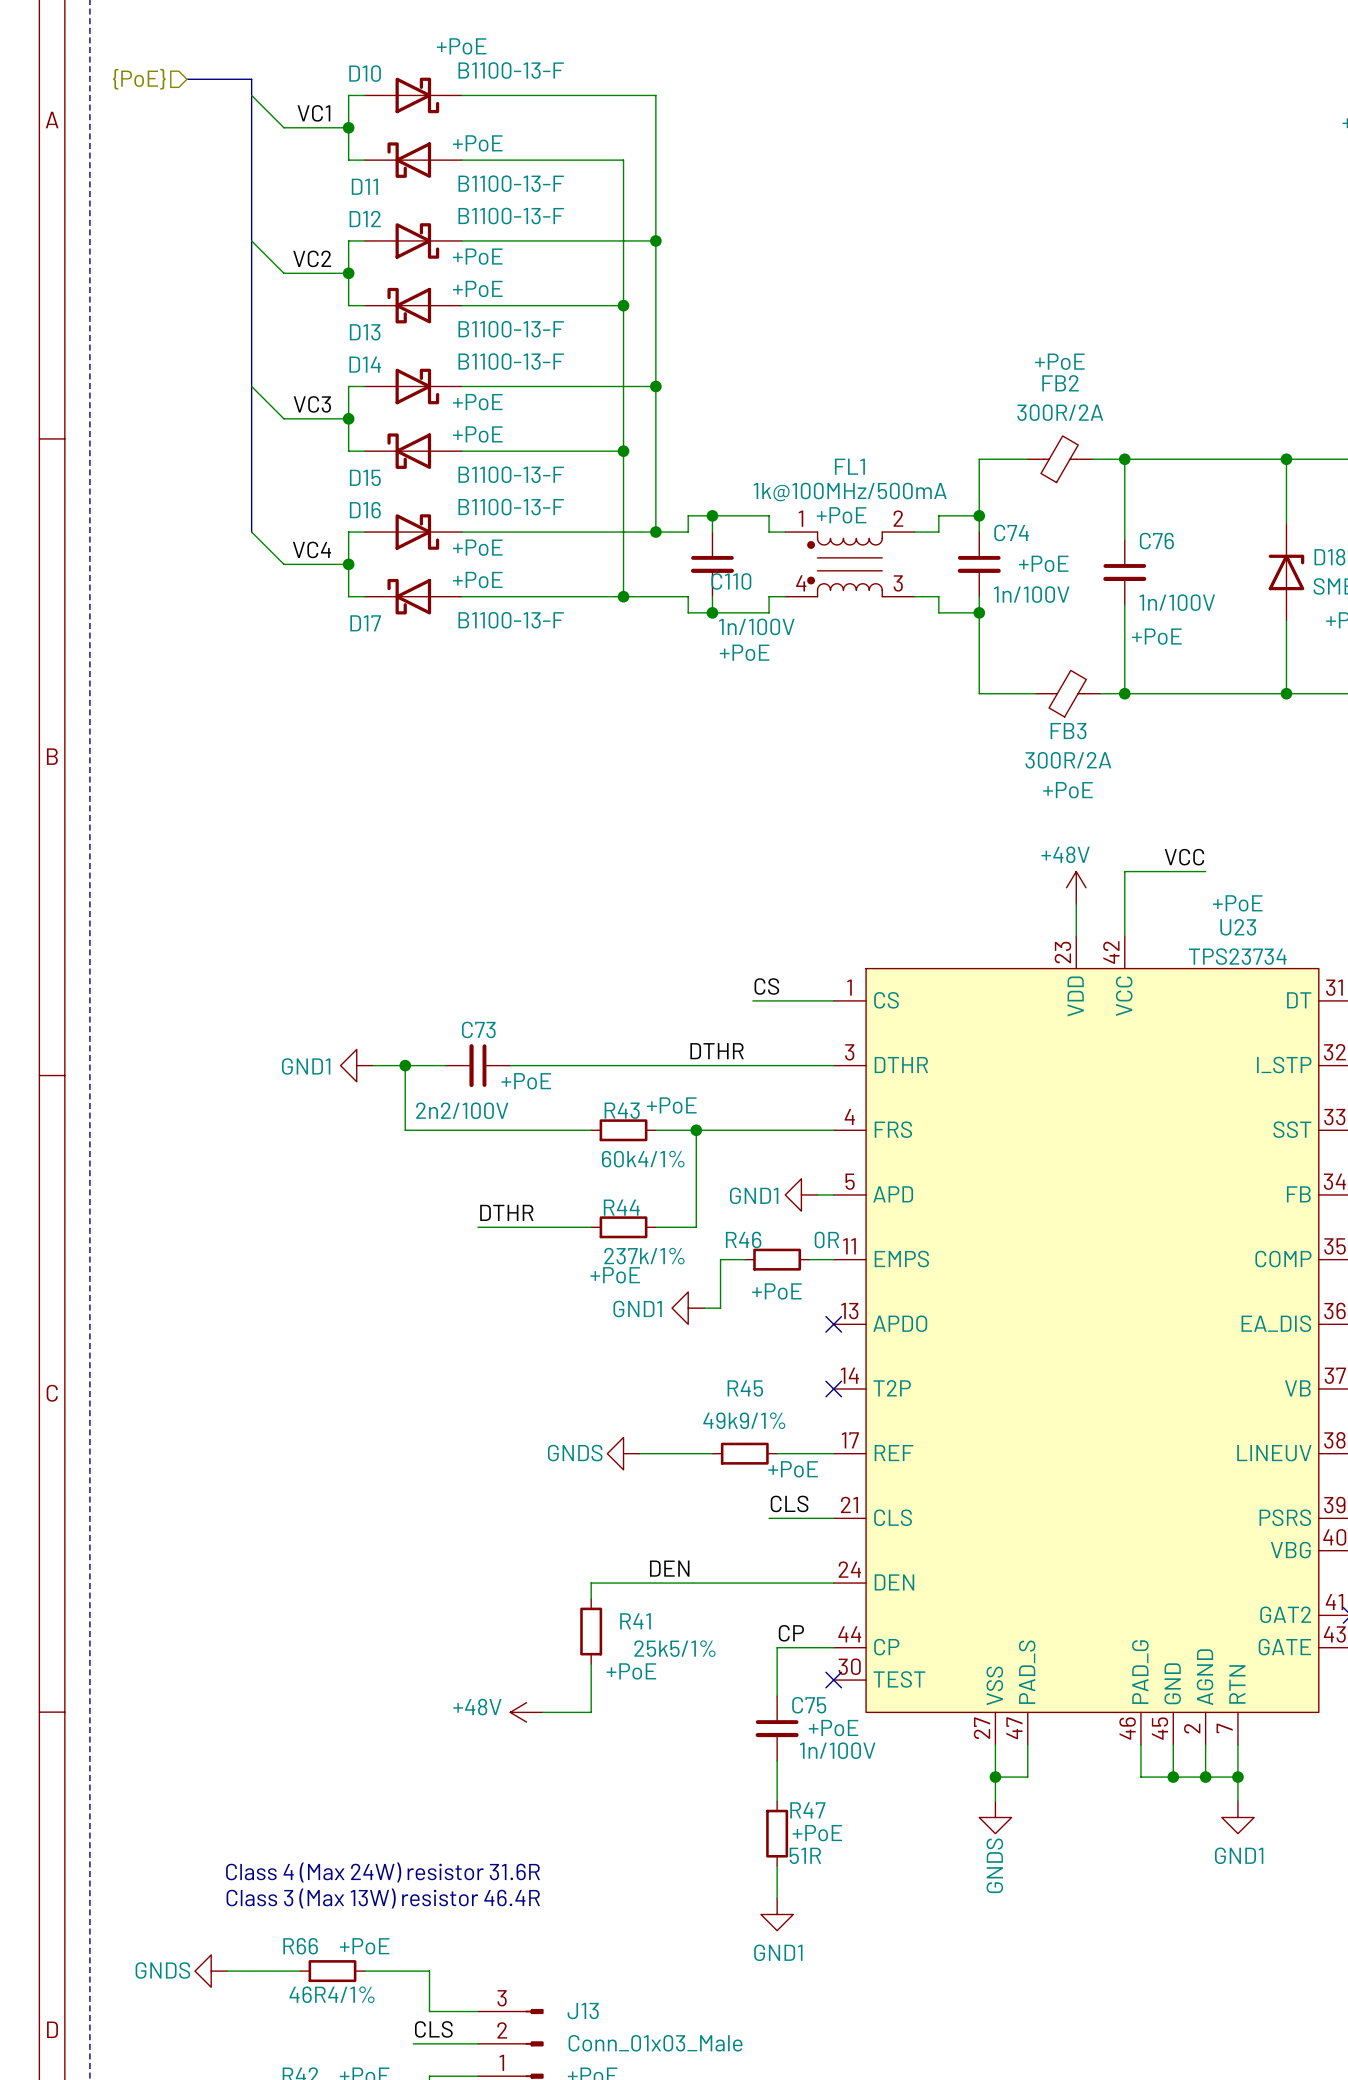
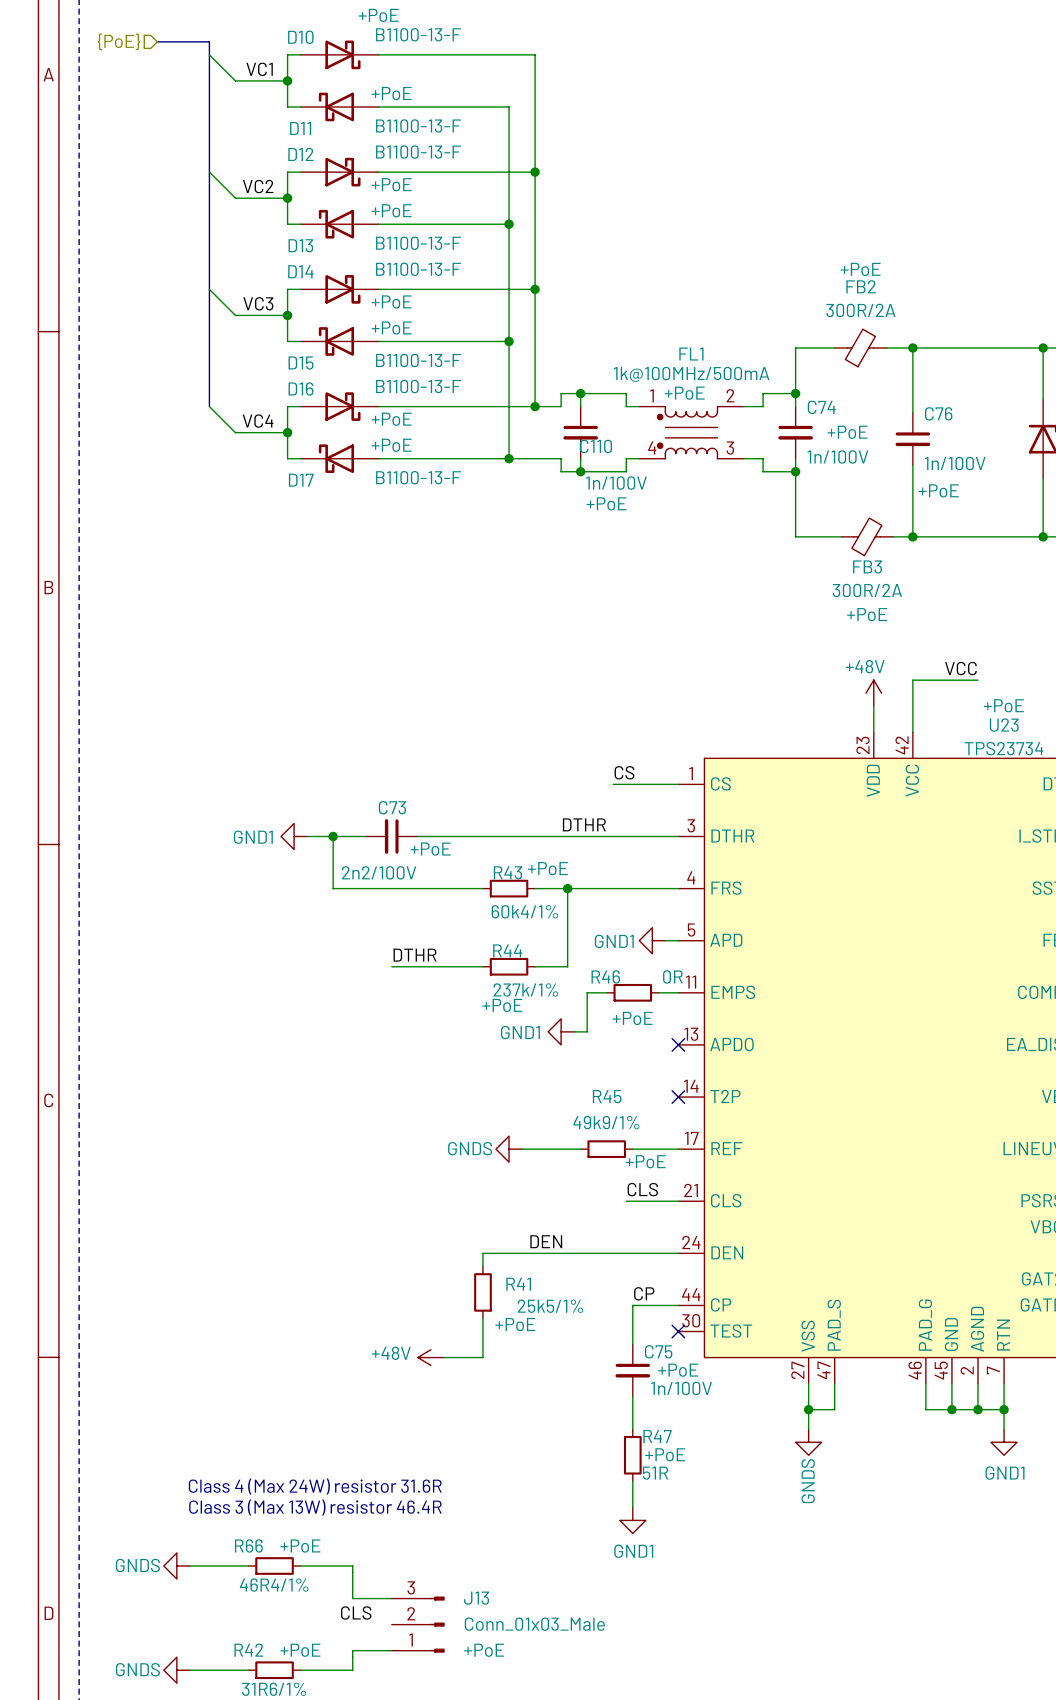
wire: (413, 2043) (478, 2043) -> none

